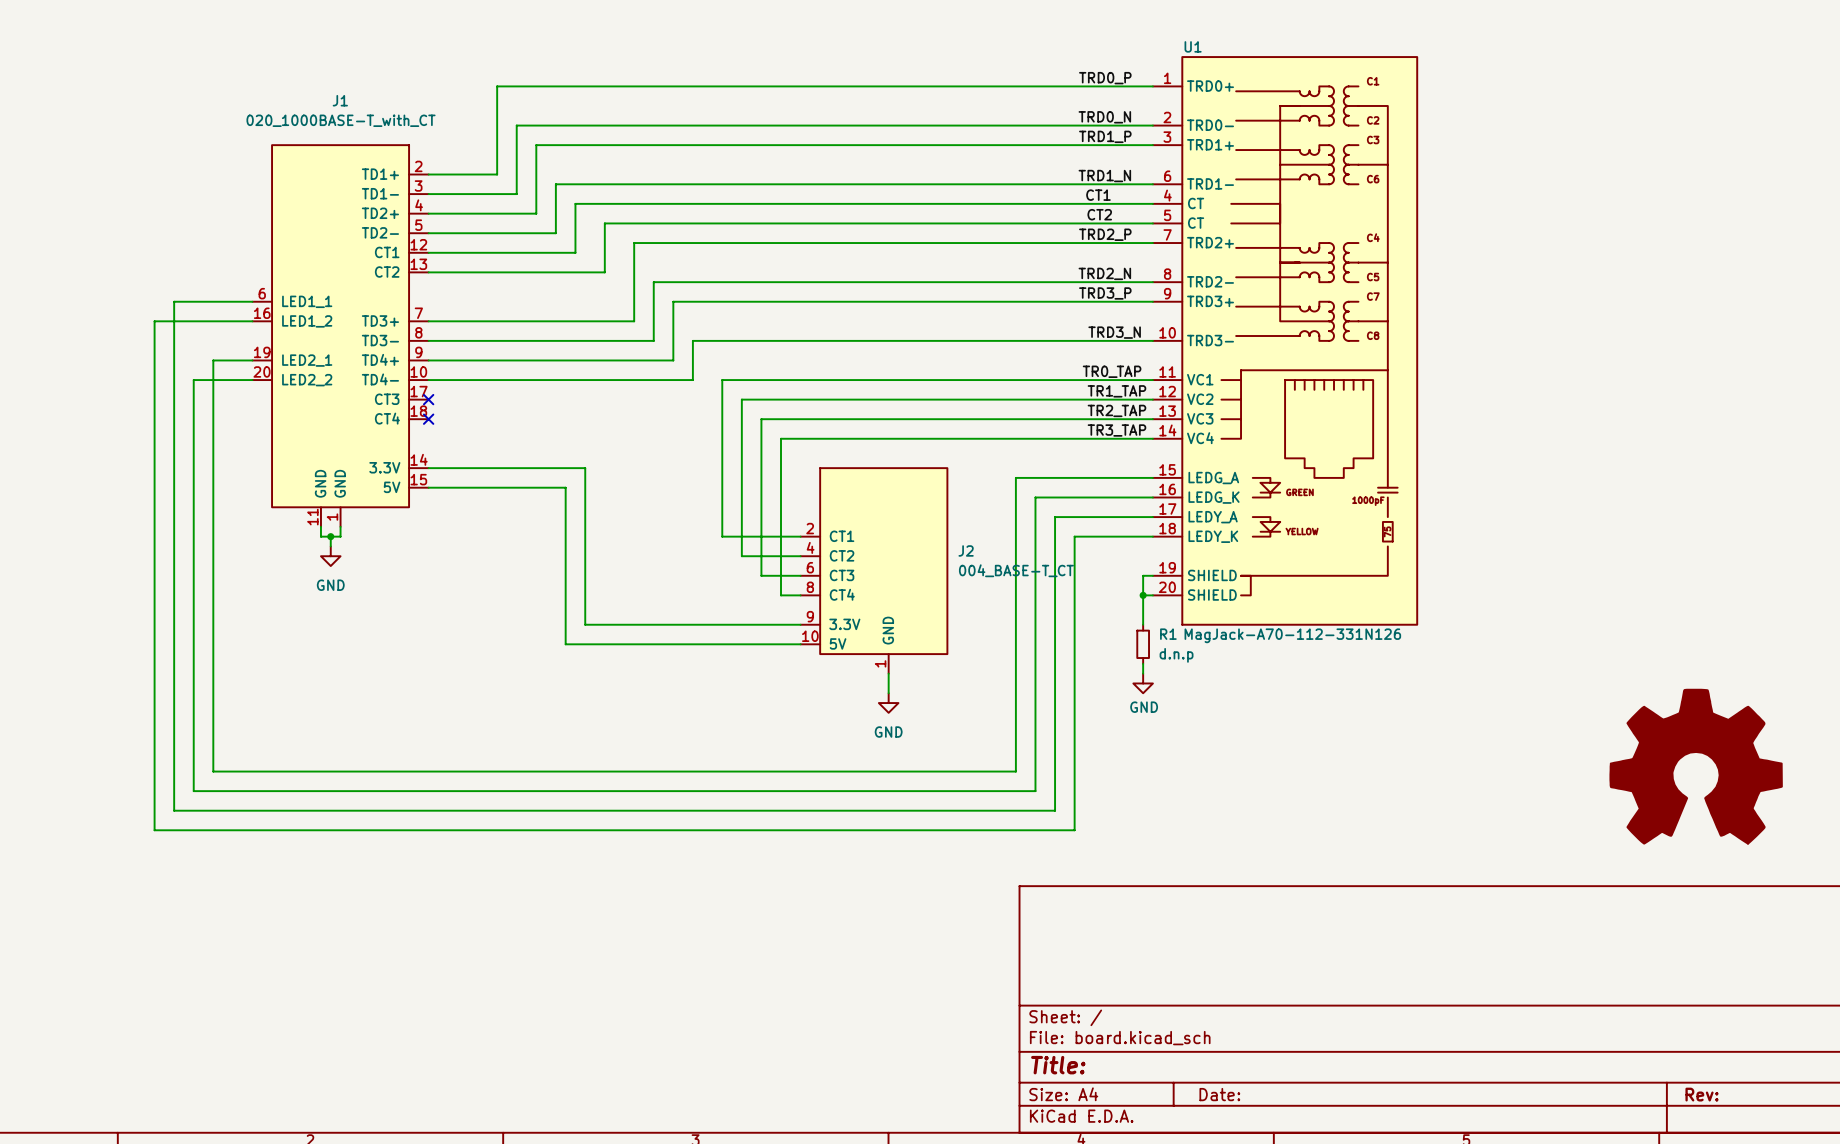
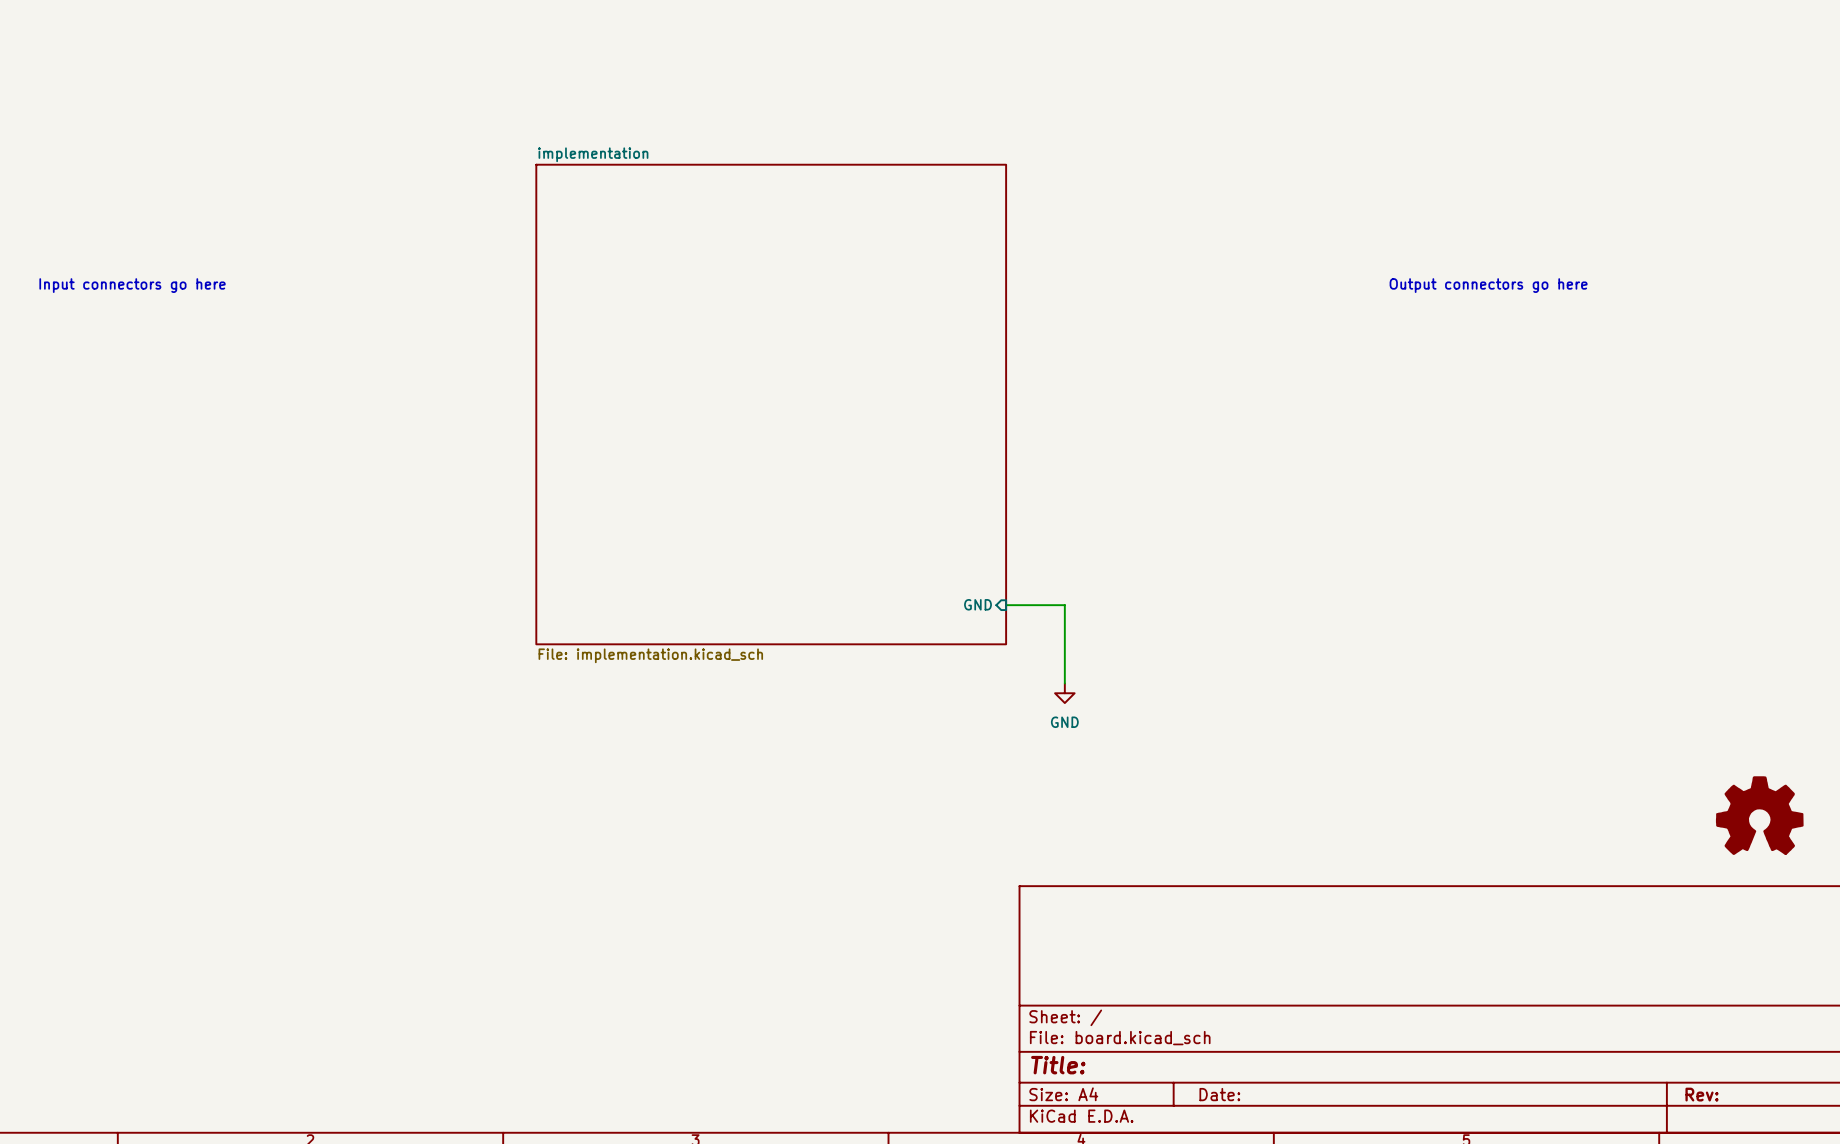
label: TRD0_P (1105, 78) -> none
wire: (1152, 86) (497, 86) (497, 174) (428, 174) -> none
label: TRD0_N (1104, 117) -> none
wire: (1152, 125) (516, 125) (516, 194) (428, 194) -> none
label: TRD1_P (1105, 136) -> none
wire: (1152, 145) (536, 145) (536, 213) (428, 213) -> none
label: TRD1_N (1104, 176) -> none
wire: (1152, 184) (555, 184) (555, 233) (428, 233) -> none
label: CT1 (1098, 195) -> none
wire: (1152, 203) (575, 203) (575, 252) (428, 252) -> none
label: CT2 (1099, 214) -> none
wire: (1152, 223) (604, 223) (604, 272) (428, 272) -> none
label: TRD2_P (1105, 234) -> none
wire: (1152, 243) (634, 243) (634, 321) (428, 321) -> none
label: TRD2_N (1104, 273) -> none
wire: (1152, 282) (653, 282) (653, 340) (428, 340) -> none
text: none -> Input connectors go here (132, 285)
text: none -> Output connectors go here (1488, 285)
label: TRD3_P (1105, 293) -> none
wire: (252, 301) (174, 301) (174, 810) (1055, 810) (1055, 517) (1152, 517) -> none
wire: (1152, 301) (673, 301) (673, 360) (428, 360) -> none
wire: (252, 321) (154, 321) (154, 830) (1074, 830) (1074, 536) (1152, 536) -> none
label: TRD3_N (1114, 332) -> none
J1: 020_1000BASE-T_with_CT (340, 336) -> none
wire: (1152, 340) (692, 340) (692, 380) (428, 380) -> none
U1: MagJack-A70-112-331N126 (1285, 340) -> none
wire: (252, 360) (213, 360) (213, 771) (1015, 771) (1015, 477) (1152, 477) -> none
label: TR0_TAP (1112, 371) -> none
wire: (252, 380) (193, 380) (193, 791) (1035, 791) (1035, 497) (1152, 497) -> none
wire: (1152, 380) (722, 380) (722, 536) (800, 536) -> none
label: TR1_TAP (1116, 391) -> none
no-connect mark: (428, 399) -> none
wire: (1152, 399) (741, 399) (741, 556) (800, 556) -> none
sheet implementation: none -> File: implementation.kicad_sch (771, 404)
label: TR2_TAP (1116, 410) -> none
no-connect mark: (428, 419) -> none
wire: (1152, 419) (761, 419) (761, 575) (800, 575) -> none
label: TR3_TAP (1116, 430) -> none
wire: (1152, 438) (781, 438) (781, 595) (800, 595) -> none
wire: (428, 468) (585, 468) (585, 624) (800, 624) -> none
wire: (428, 487) (565, 487) (565, 644) (800, 644) -> none
wire: (320, 526) (320, 536) (340, 536) (340, 526) -> none
wire: (330, 536) (330, 546) -> none
junction: (330, 536) -> none
power symbol: GND (330, 556) -> none
J2: 004_BASE-T_CT (873, 570) -> none
wire: (1152, 575) (1143, 575) (1143, 624) -> none
wire: (1143, 595) (1152, 595) -> none
junction: (1143, 595) -> none
sheet pin: none -> GND (978, 604)
wire: none -> (1006, 605) (1064, 605) (1064, 683)
R1: d.n.p (1143, 644) -> none
wire: (1143, 663) (1143, 673) -> none
wire: (888, 673) (888, 693) -> none
power symbol position: GND (1143, 683) -> GND (1064, 693)
power symbol: GND (888, 703) -> none
power symbol text position: GND (1144, 707) -> GND (1064, 722)
part: (1696, 766) -> none
part: none -> (1759, 815)

